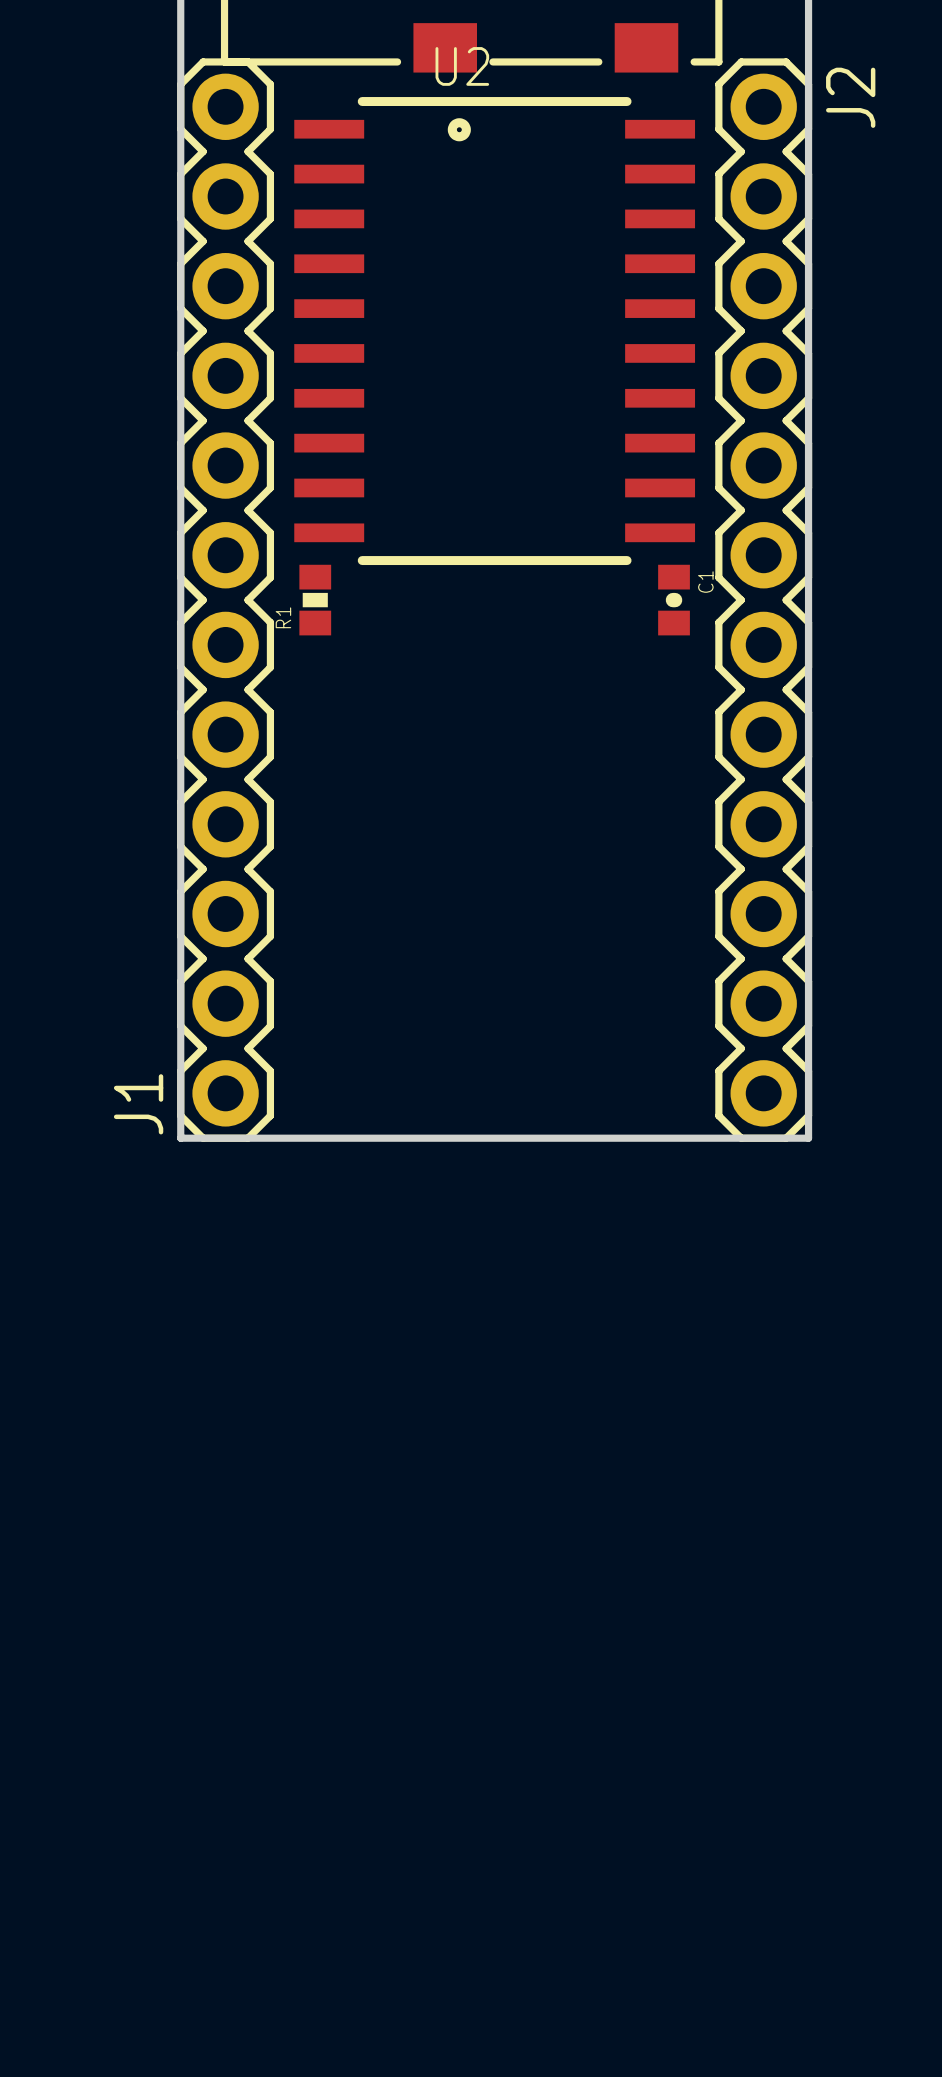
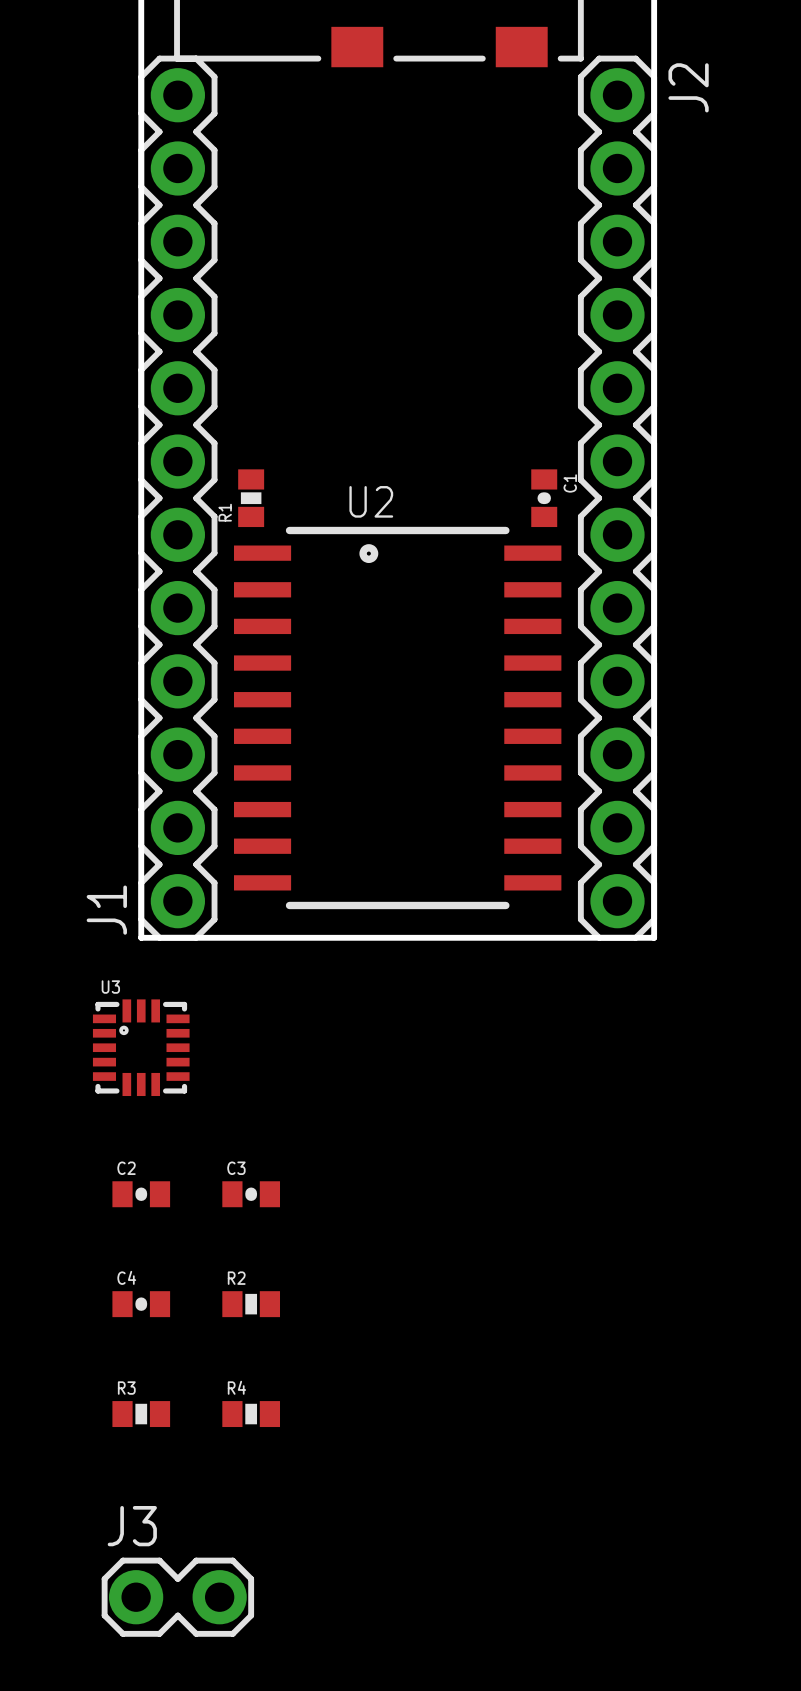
U2 position: (494, 331) -> (397, 718)
U3: none -> (141, 1047)
C2: none -> (141, 1194)
C3: none -> (251, 1194)
C4: none -> (141, 1304)
R2: none -> (251, 1304)
R3: none -> (141, 1414)
R4: none -> (251, 1414)
J3: none -> (177, 1597)

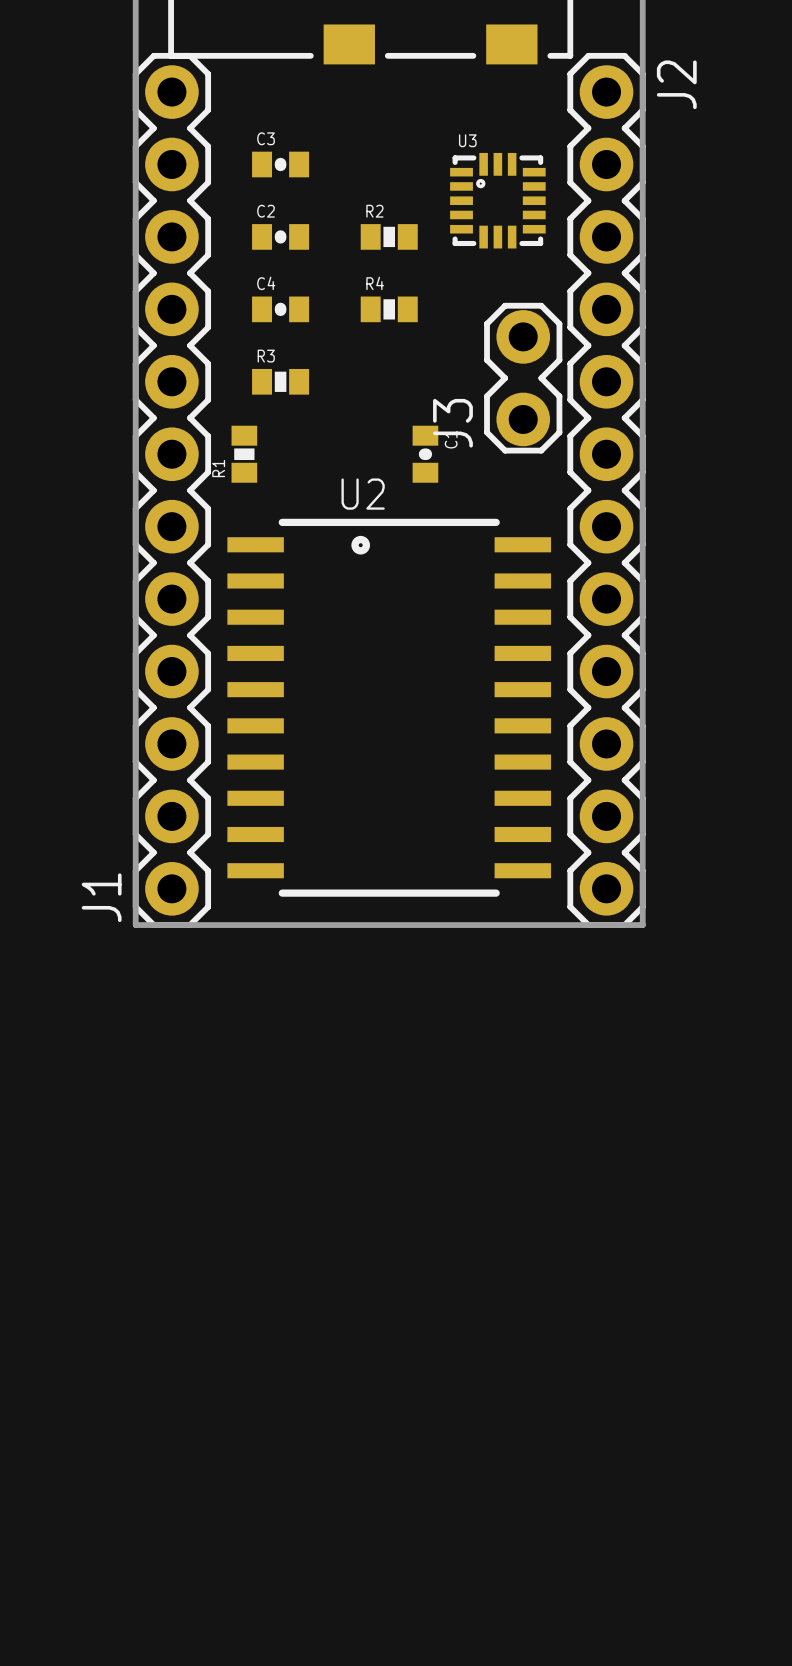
R1 position: (251, 498) -> (244, 454)
C1 position: (544, 498) -> (425, 454)
U3 position: (141, 1047) -> (497, 200)
C2 position: (141, 1194) -> (280, 236)
C3 position: (251, 1194) -> (280, 164)
C4 position: (141, 1304) -> (280, 309)
R2 position: (251, 1304) -> (389, 236)
R3 position: (141, 1414) -> (280, 381)
R4 position: (251, 1414) -> (389, 309)
J3 name position: J3 (132, 1526) -> J3 (452, 423)
J3 rotation: 0° (177, 1597) -> 90° clockwise (523, 378)
J3 position: (177, 1597) -> (523, 378)

